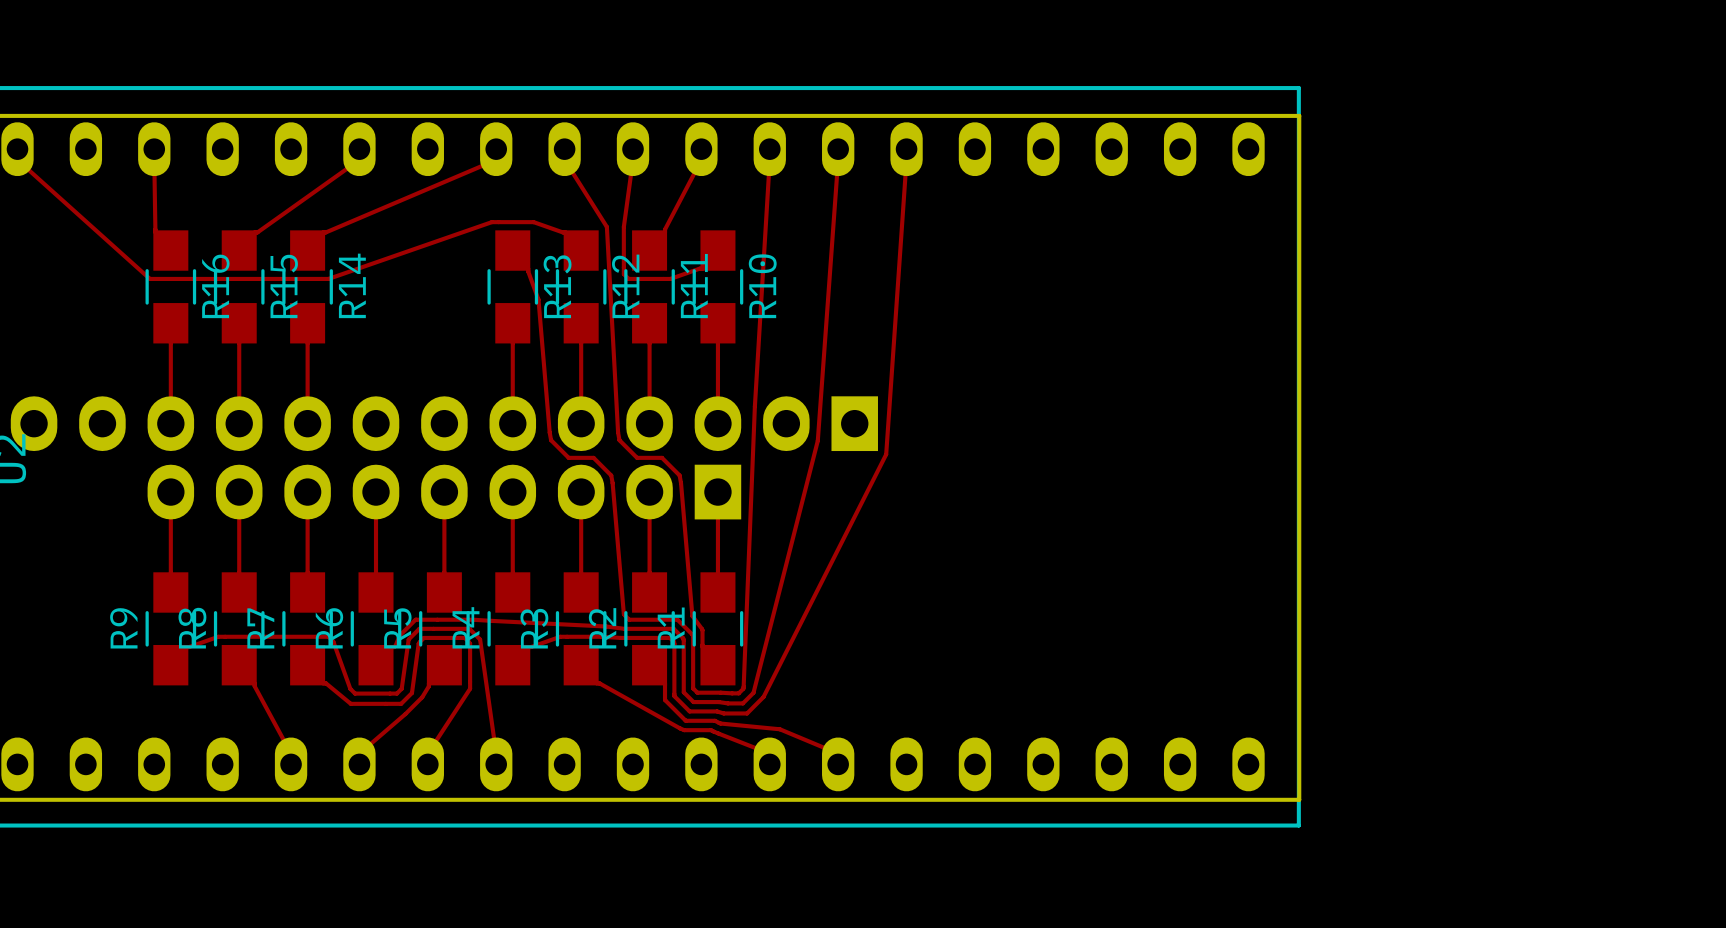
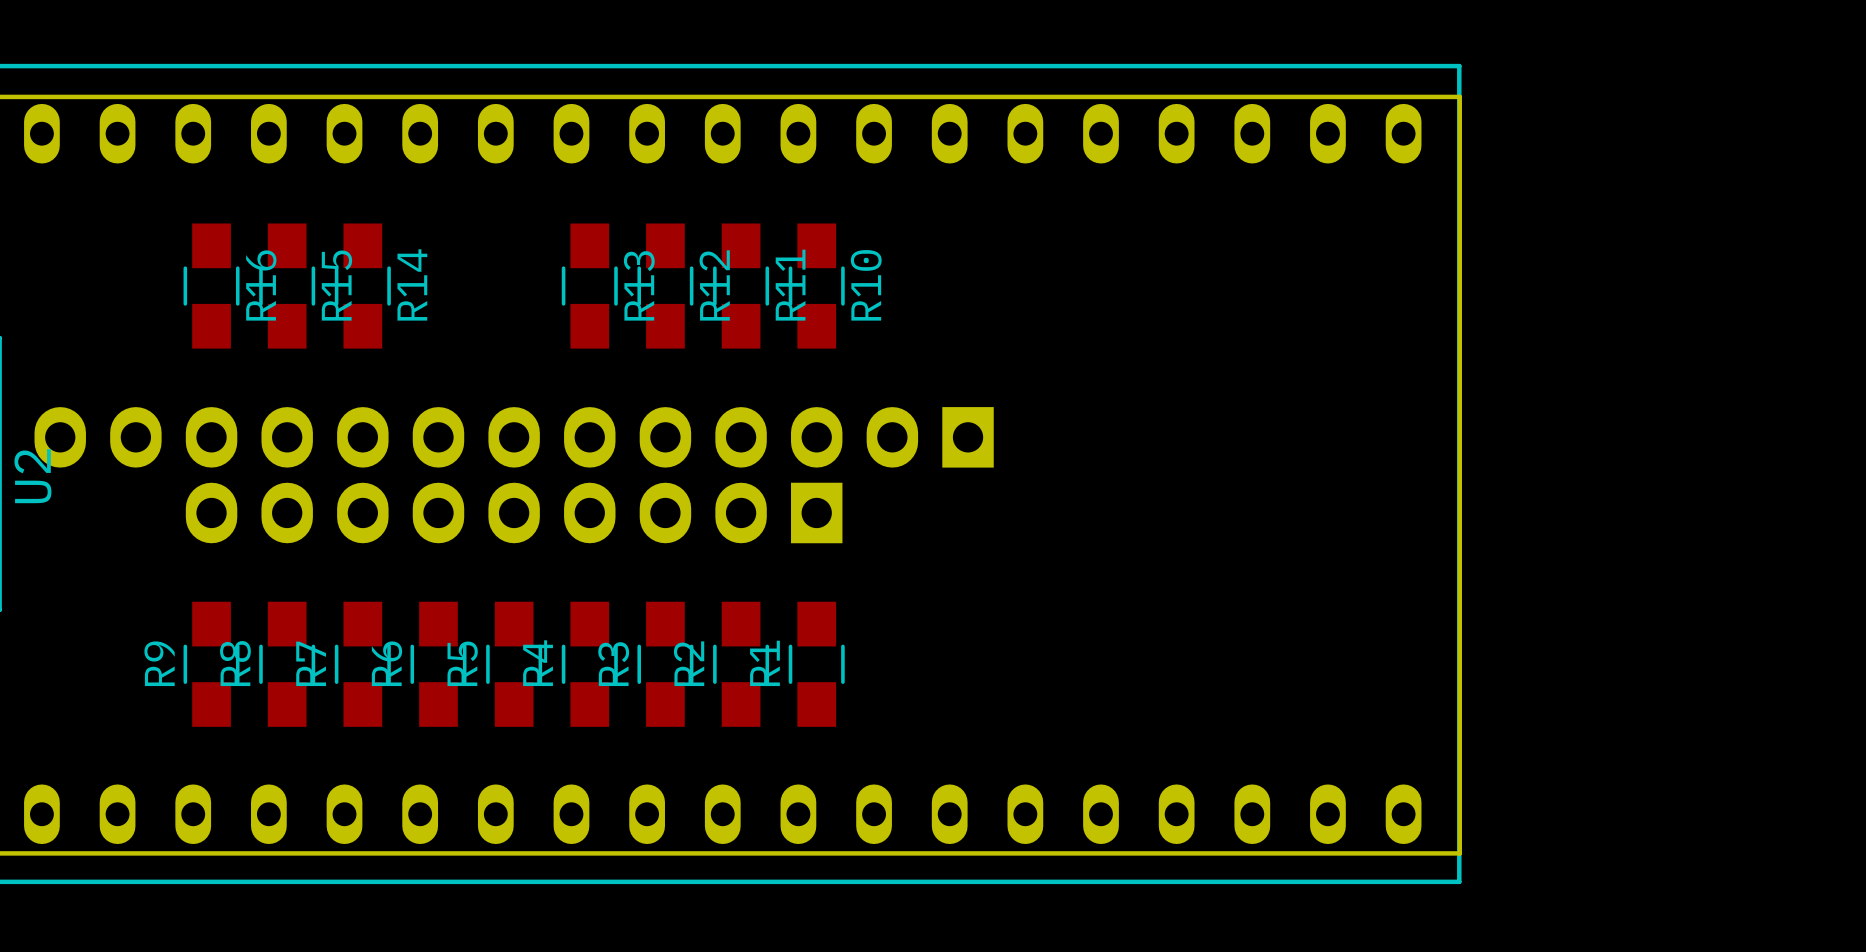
track: (17, 149) (17, 159) (149, 278) (328, 278) (491, 222) (533, 222) (565, 232) (581, 250) -> none
track: (154, 149) (155, 232) (170, 250) -> none
track: (359, 149) (359, 159) (257, 232) (254, 232) (239, 250) -> none
track: (496, 149) (496, 159) (323, 232) (307, 250) -> none
track: (564, 149) (564, 159) (606, 226) (619, 440) (637, 457) (662, 457) (679, 475) (692, 616) (702, 630) (702, 647) (717, 665) -> none
track: (633, 149) (623, 226) (623, 274) (628, 278) (670, 278) (702, 268) (717, 250) -> none
track: (701, 149) (701, 159) (665, 232) (649, 250) -> none
track: (769, 149) (754, 406) (743, 686) (738, 693) (697, 692) (693, 688) (693, 636) (677, 619) (629, 619) (623, 614) (611, 475) (593, 457) (568, 457) (551, 440) (538, 299) (528, 268) (512, 250) -> none
track: (838, 149) (817, 440) (753, 692) (742, 703) (693, 702) (683, 692) (683, 640) (673, 628) (624, 628) (473, 619) (415, 619) (399, 635) (395, 645) (391, 647) (376, 665) -> none
track: (906, 149) (886, 454) (763, 697) (747, 713) (689, 711) (674, 696) (674, 644) (669, 637) (560, 636) (528, 647) (512, 665) -> none
track: (170, 323) (170, 423) -> none
track: (239, 323) (239, 423) -> none
track: (307, 323) (307, 423) -> none
track: (512, 323) (512, 423) -> none
track: (581, 323) (581, 423) -> none
track: (649, 323) (649, 423) -> none
track: (717, 323) (717, 423) -> none
track: (170, 492) (170, 592) -> none
track: (239, 492) (239, 592) -> none
track: (307, 492) (307, 592) -> none
track: (376, 492) (376, 592) -> none
track: (444, 492) (444, 592) -> none
track: (512, 492) (512, 592) -> none
track: (581, 492) (581, 592) -> none
track: (649, 492) (649, 592) -> none
track: (717, 492) (717, 592) -> none
track: (170, 665) (186, 647) (218, 636) (328, 636) (333, 641) (350, 688) (355, 693) (396, 693) (401, 688) (408, 639) (419, 628) (469, 628) (480, 639) (496, 764) -> none
track: (239, 665) (254, 683) (291, 753) (291, 764) -> none
track: (307, 665) (323, 683) (325, 683) (350, 703) (401, 703) (411, 693) (419, 642) (423, 637) (464, 637) (470, 643) (470, 688) (427, 753) (427, 764) -> none
track: (444, 665) (428, 683) (422, 697) (359, 753) (359, 764) -> none
track: (581, 665) (596, 683) (680, 728) (711, 730) (769, 753) (769, 764) -> none
track: (649, 665) (665, 683) (665, 700) (685, 720) (714, 720) (720, 723) (779, 729) (838, 753) (838, 764) -> none

